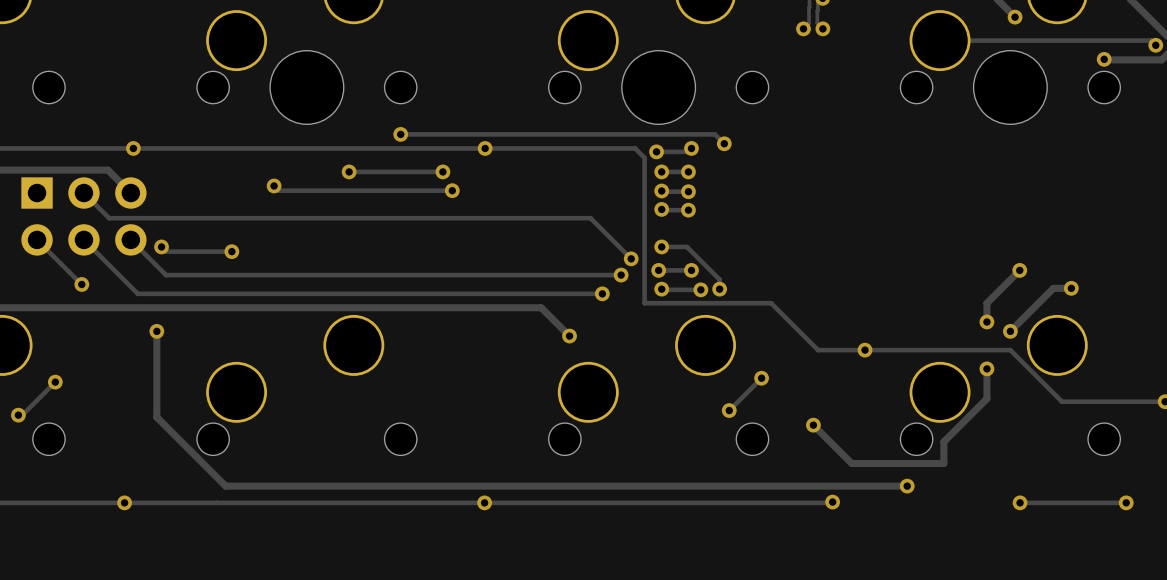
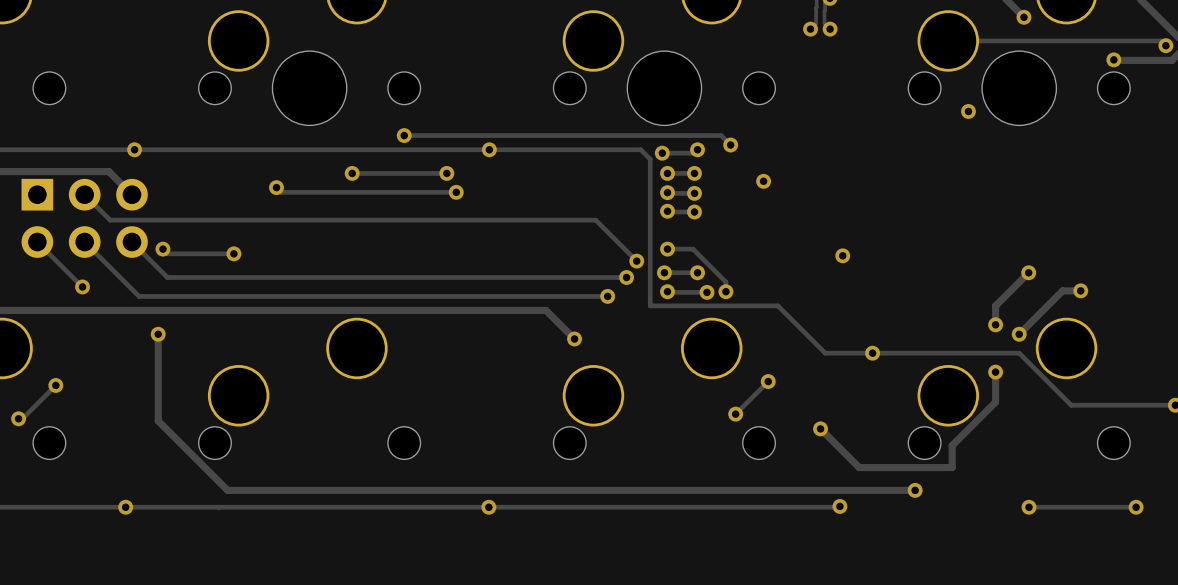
via: none -> (968, 111)
via: none -> (763, 181)
via: none -> (842, 255)

